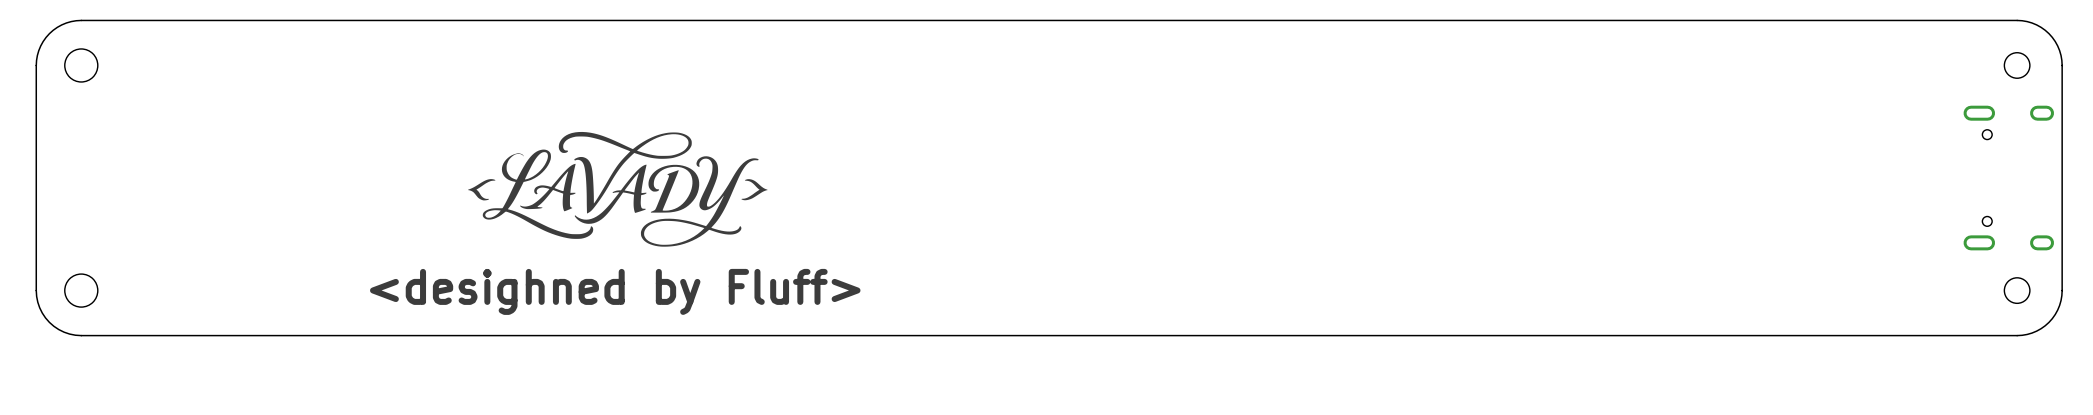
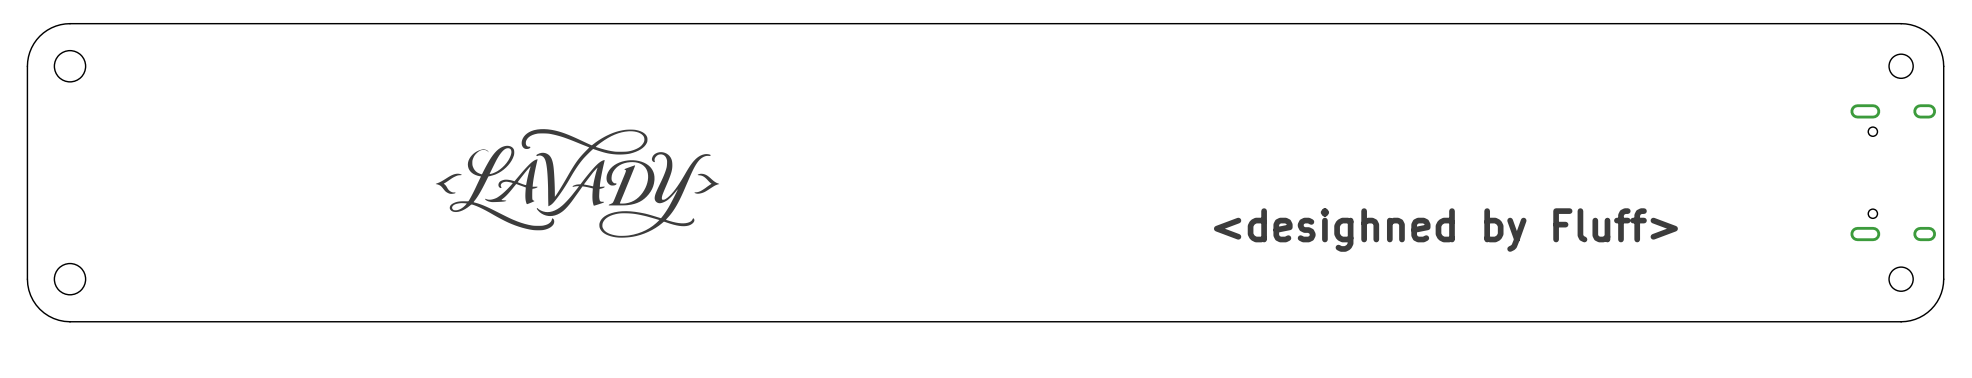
text: none -> <desighned by Fluff> (1445, 230)
text: <desighned by Fluff> (615, 291) -> none

